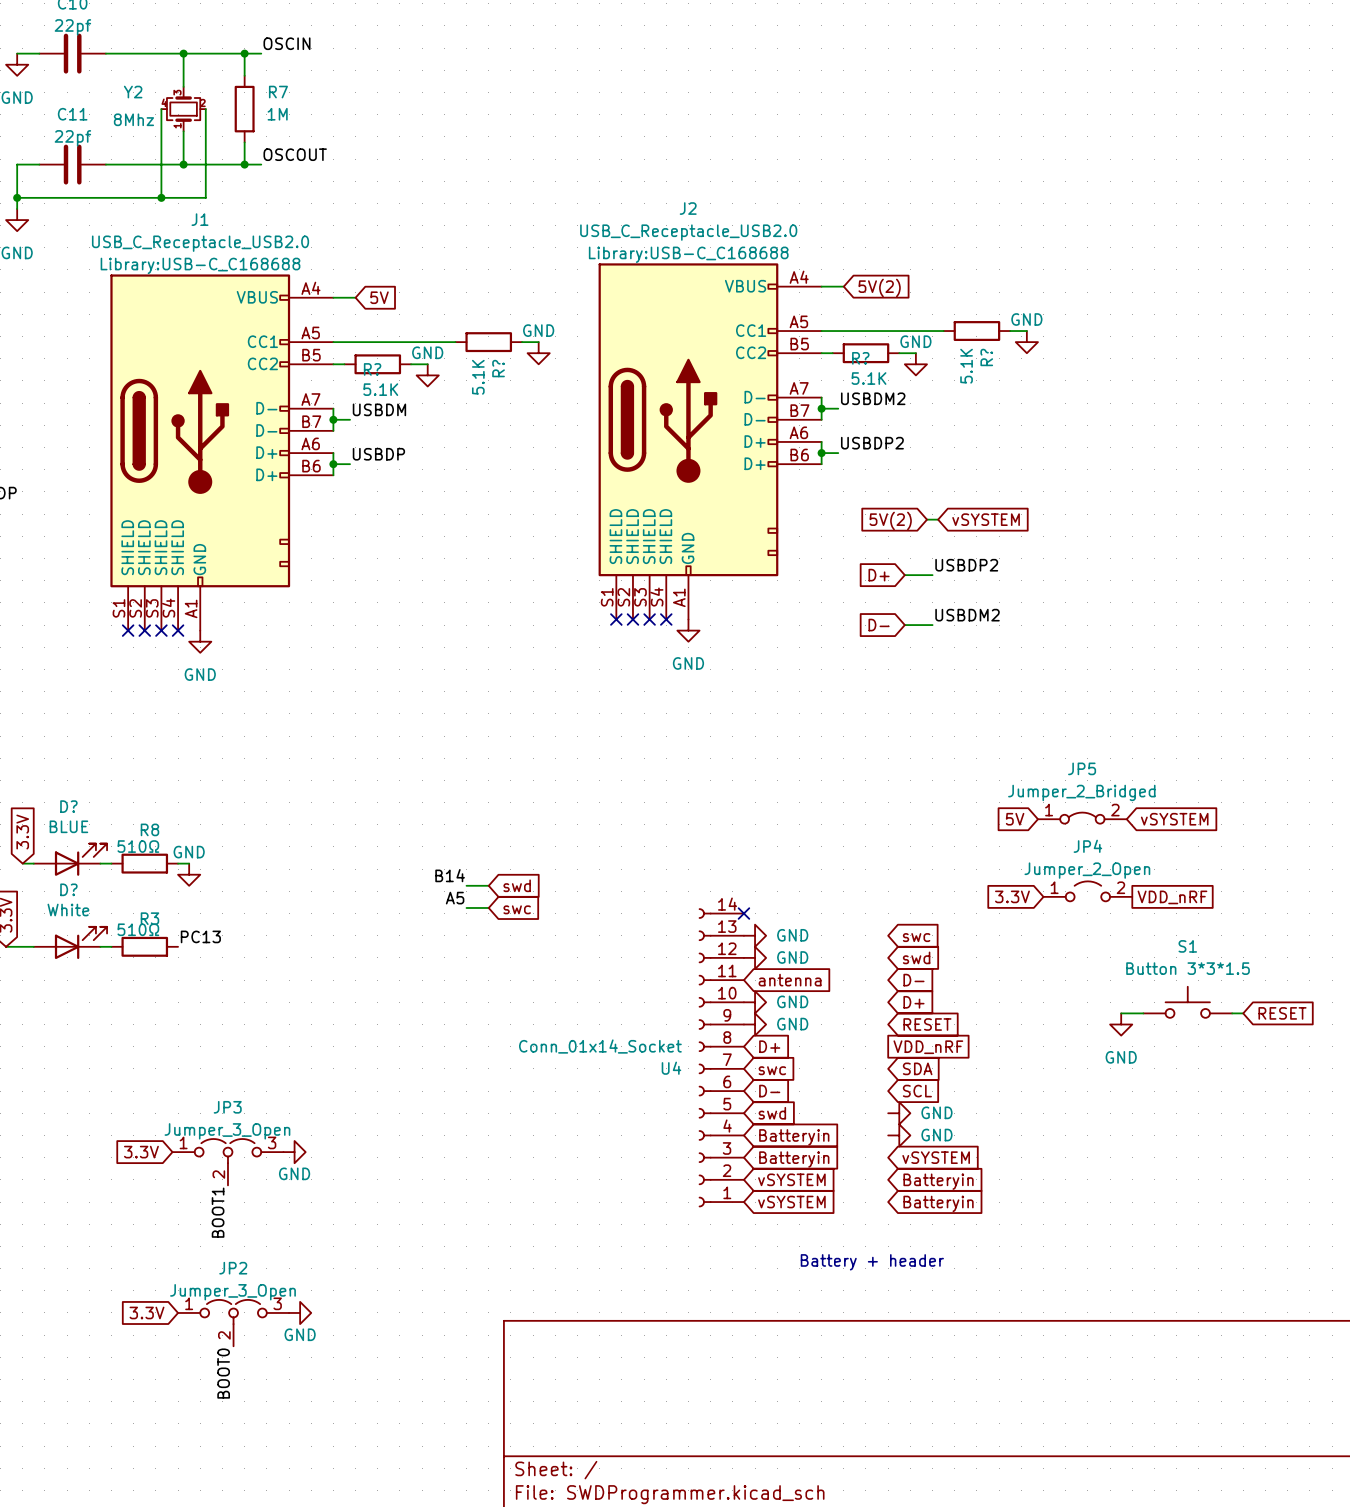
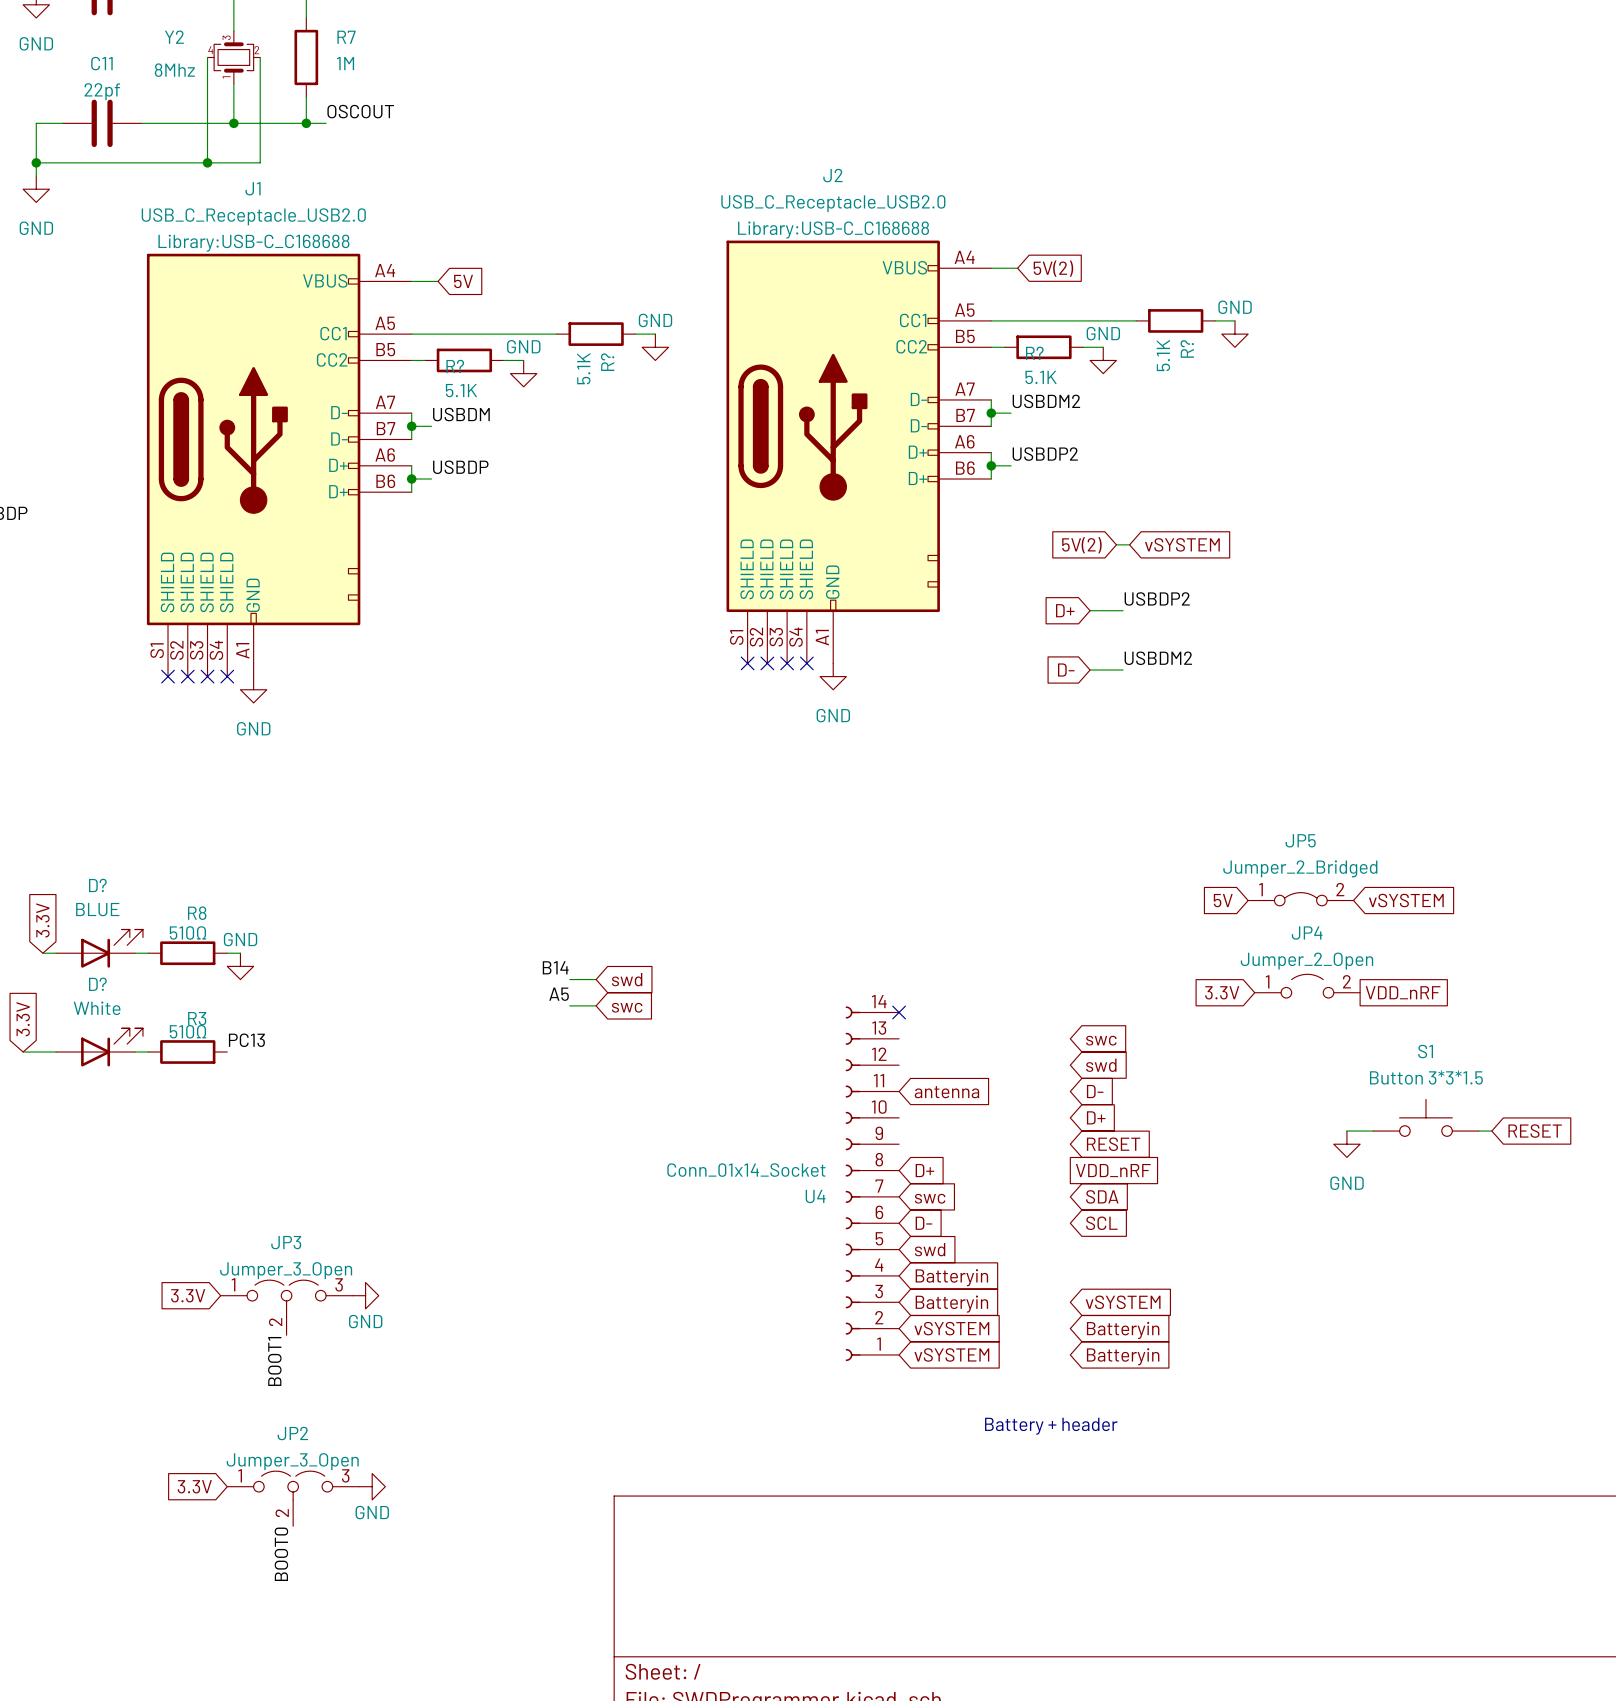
power symbol: GND (755, 935) -> none
power symbol: GND (755, 957) -> none
power symbol: GND (755, 1002) -> none
power symbol: GND (755, 1024) -> none
power symbol: GND (899, 1113) -> none
power symbol: GND (899, 1135) -> none

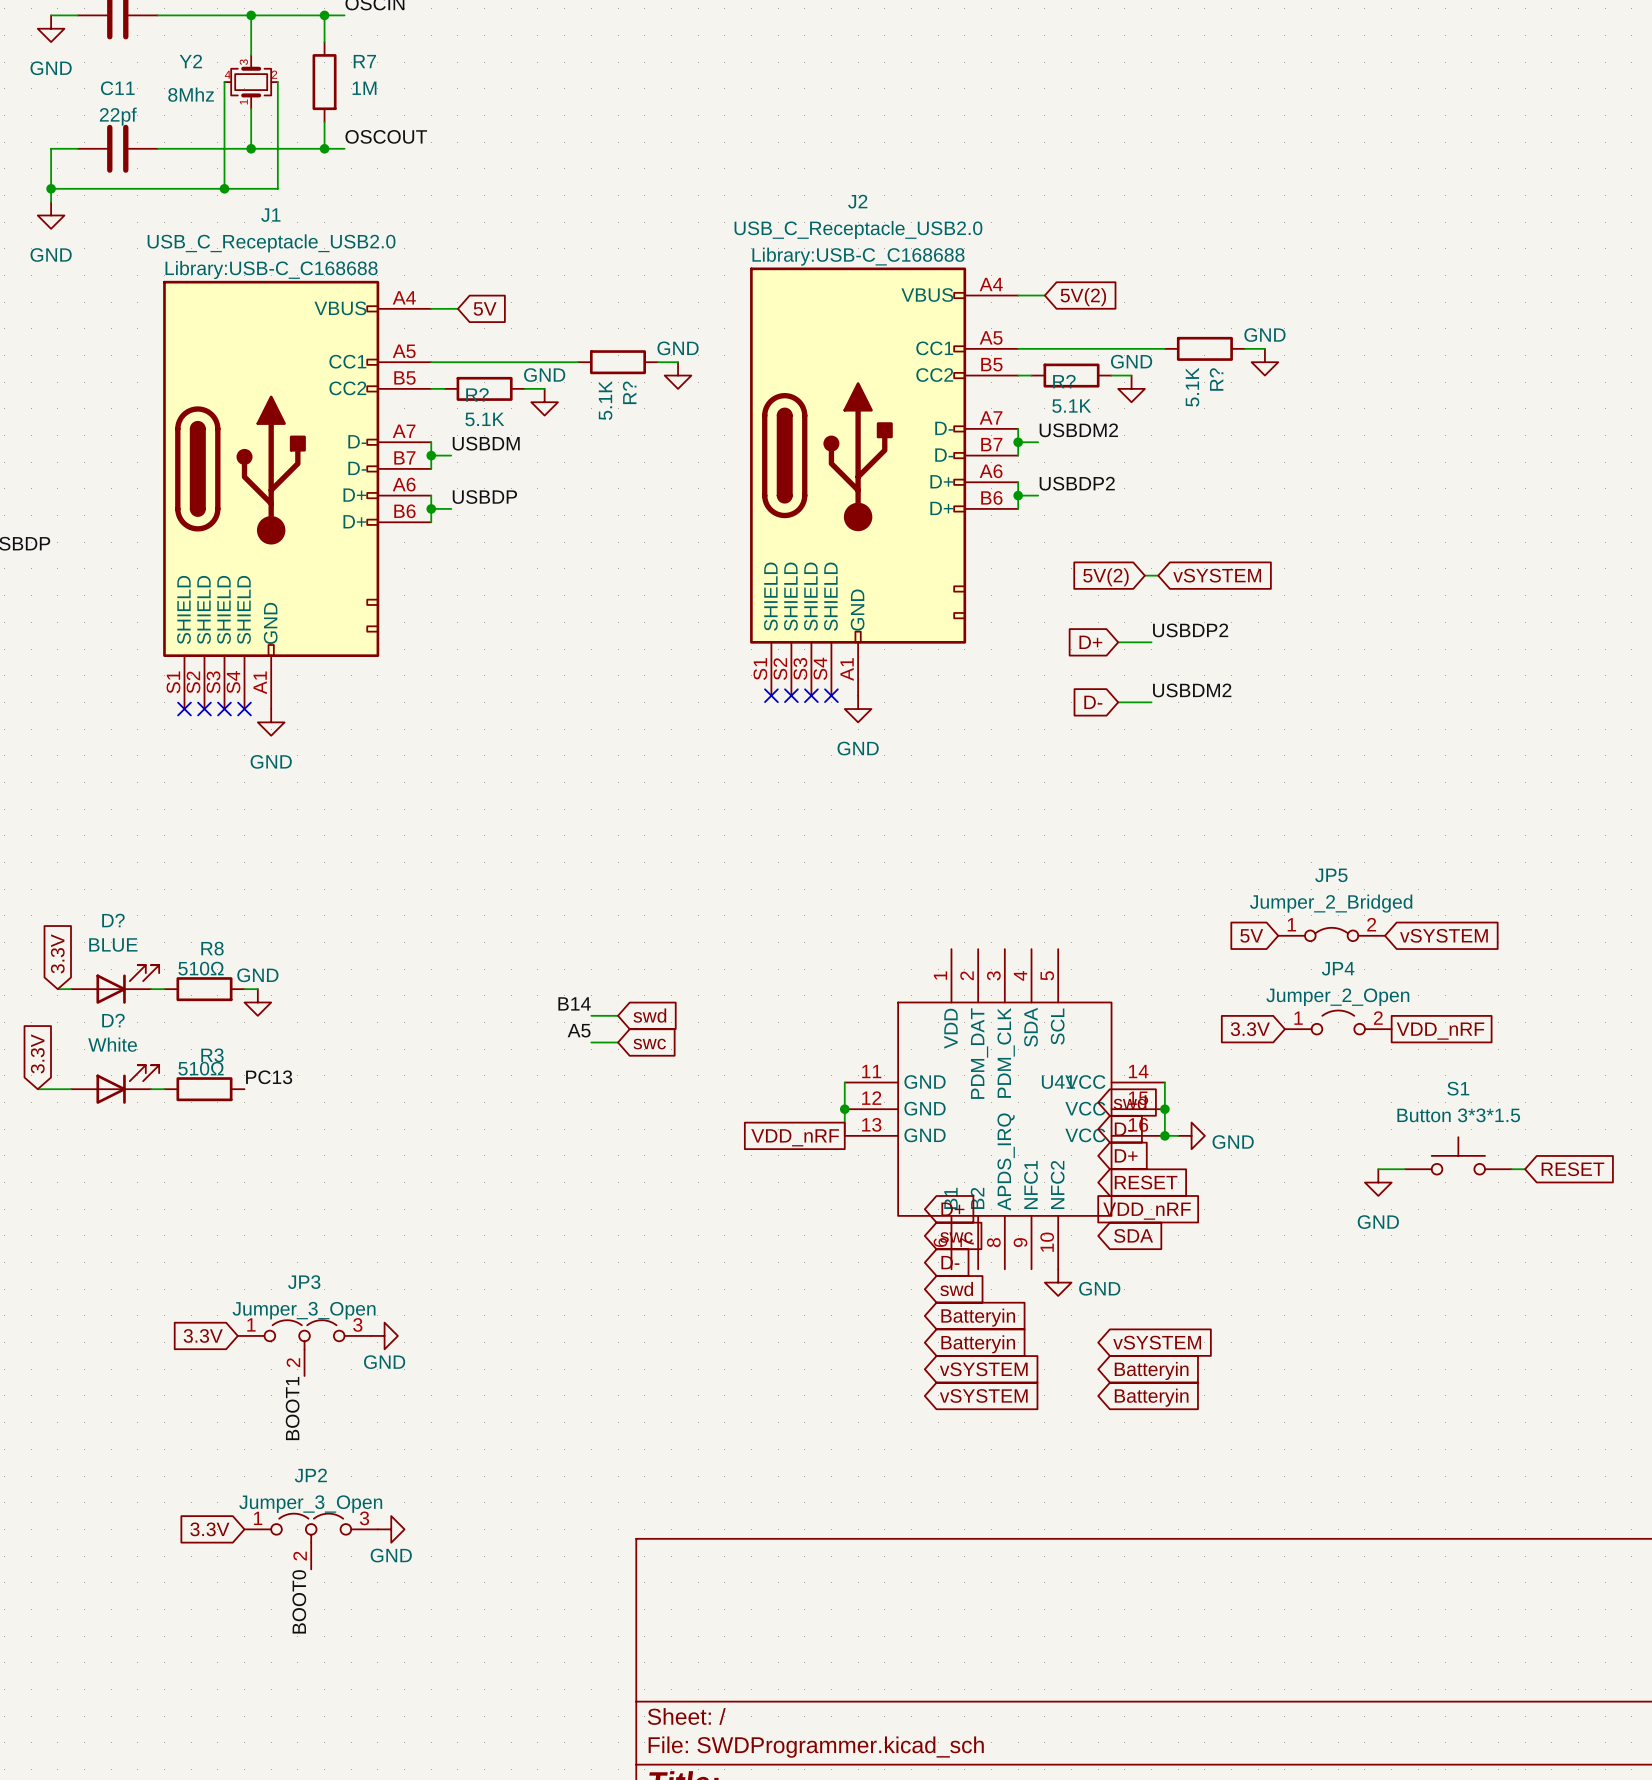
no-connect mark: (899, 1012) -> none
global label: swc (1101, 1040) -> none
wire: none -> (844, 1082) (844, 1135)
wire: none -> (1164, 1082) (1164, 1135) (1178, 1135)
junction: none -> (844, 1109)
U41: none -> (1004, 1109)
junction: none -> (1164, 1109)
global label: antenna (946, 1092) -> none
global label: none -> VDD_nRF (795, 1137)
junction: none -> (1164, 1135)
power symbol: none -> GND (1191, 1135)
U4: Conn_01x14_Socket (872, 1183) -> none
global label: SCL (1101, 1223) -> none
power symbol: none -> GND (1058, 1282)
text: Battery + header (1051, 1426) -> none

